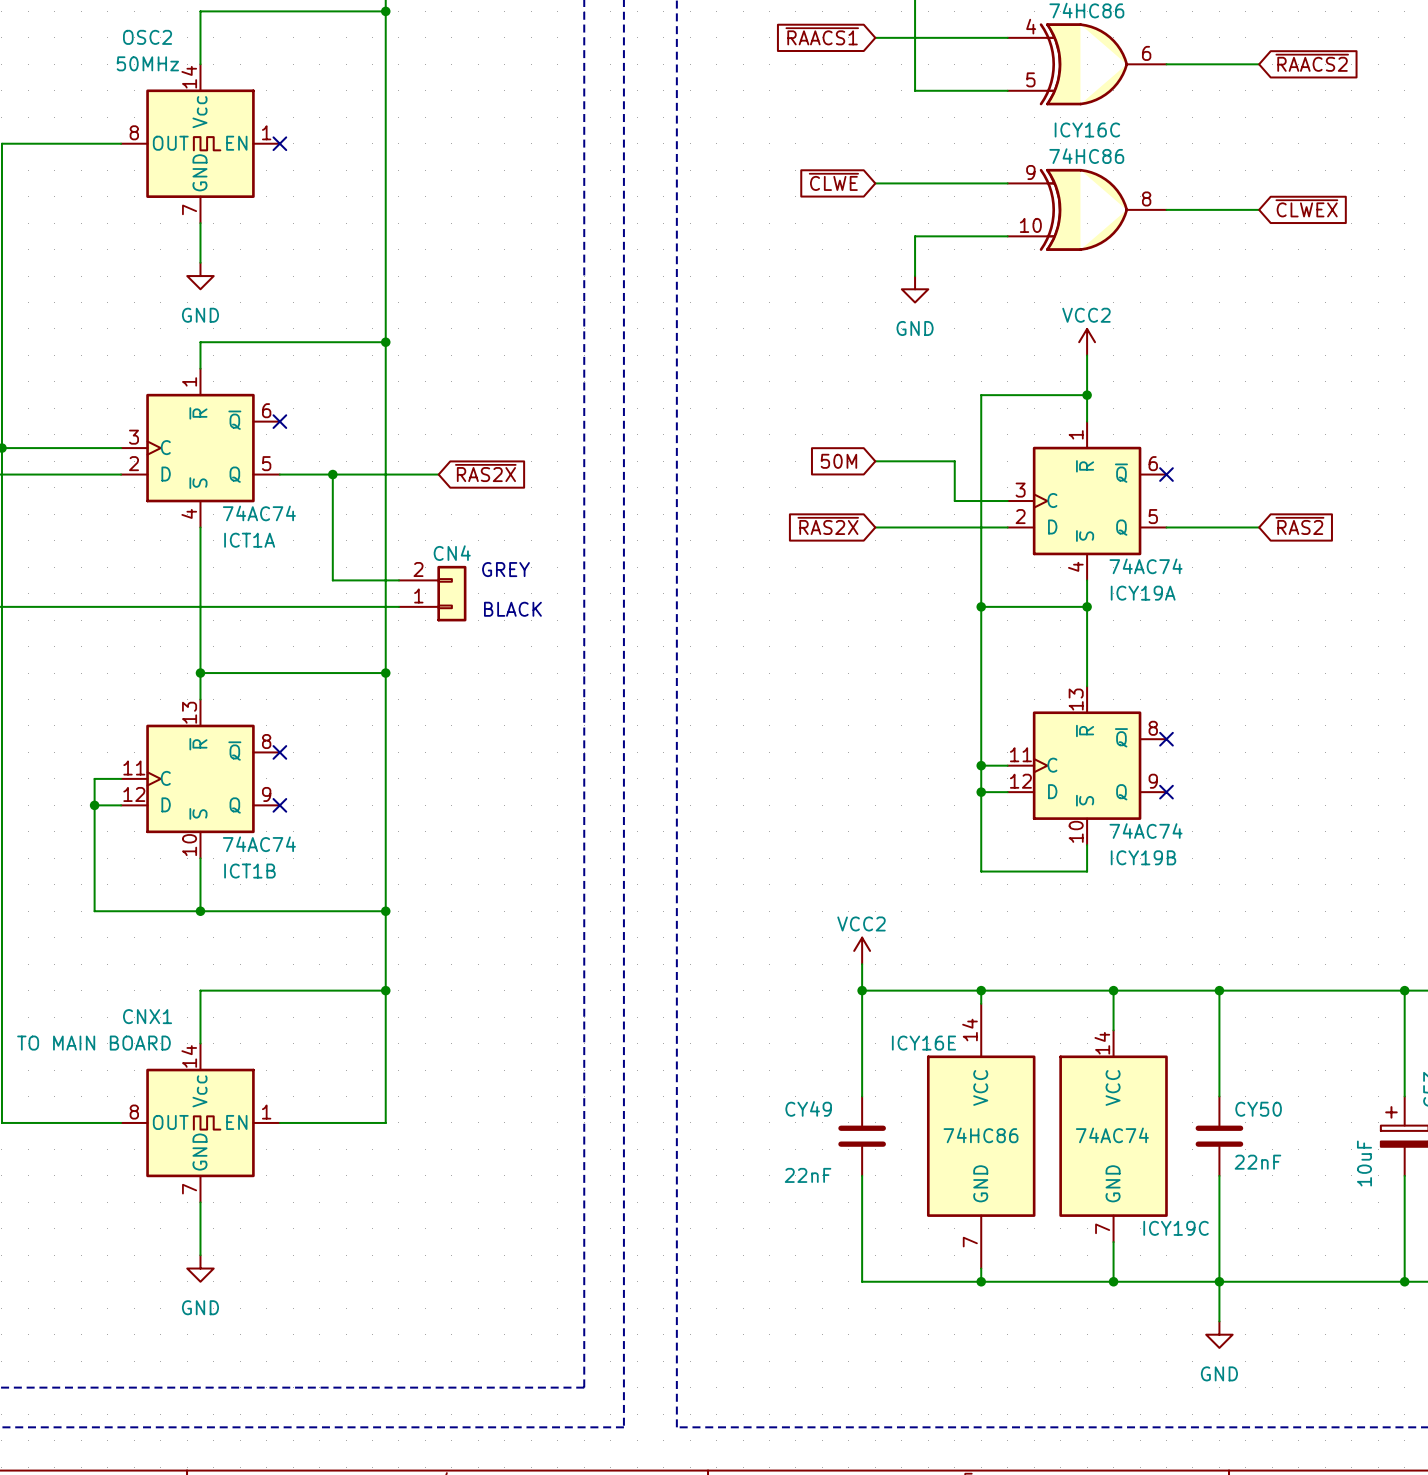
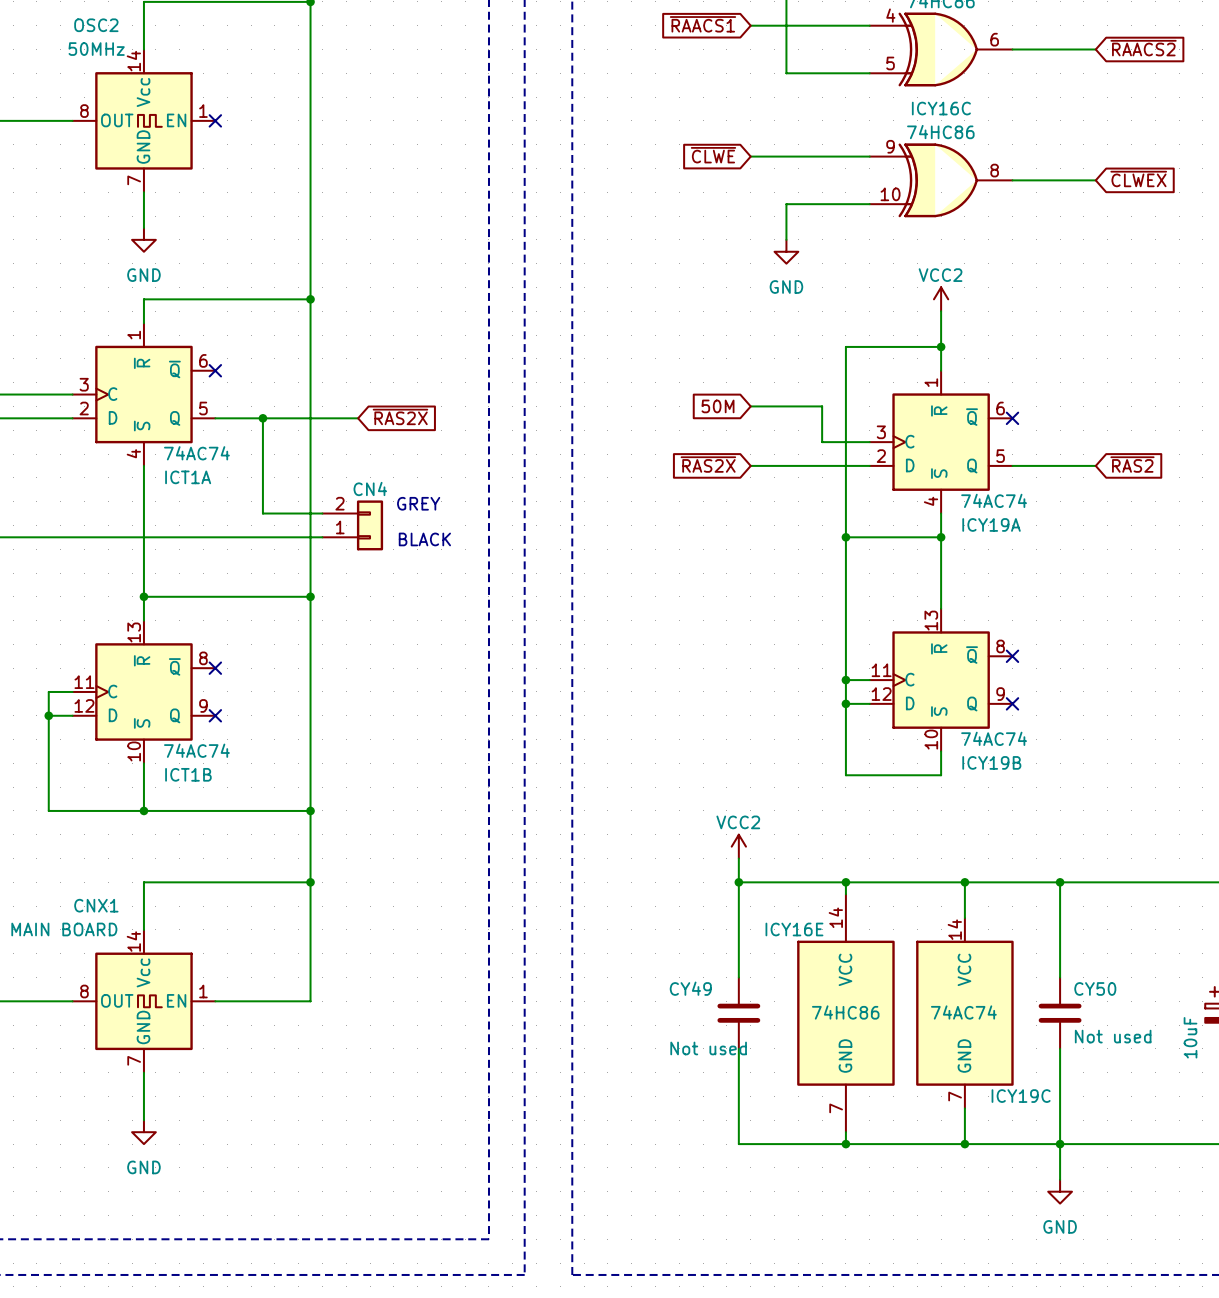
CY50 value: 22nF (1257, 1162) -> Not used (1113, 1036)
CY49 value: 22nF (808, 1175) -> Not used (708, 1048)

